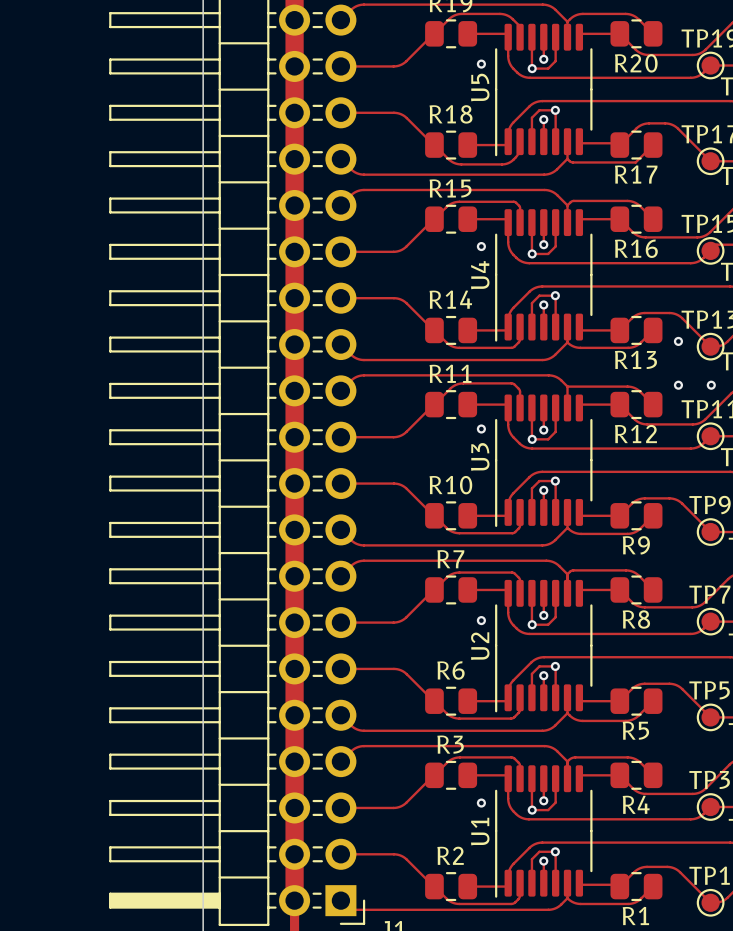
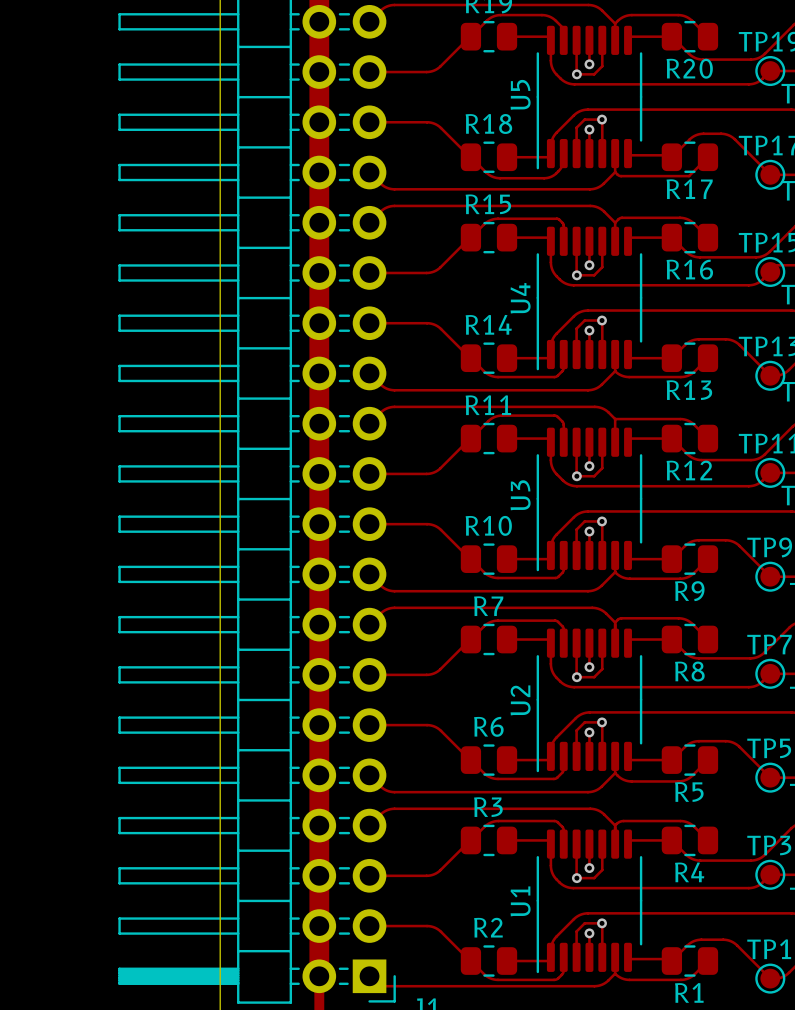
via: (481, 64) -> none
via: (481, 246) -> none
via: (678, 341) -> none
via: (678, 385) -> none
via: (711, 385) -> none
via: (481, 429) -> none
via: (481, 620) -> none
via: (481, 803) -> none

